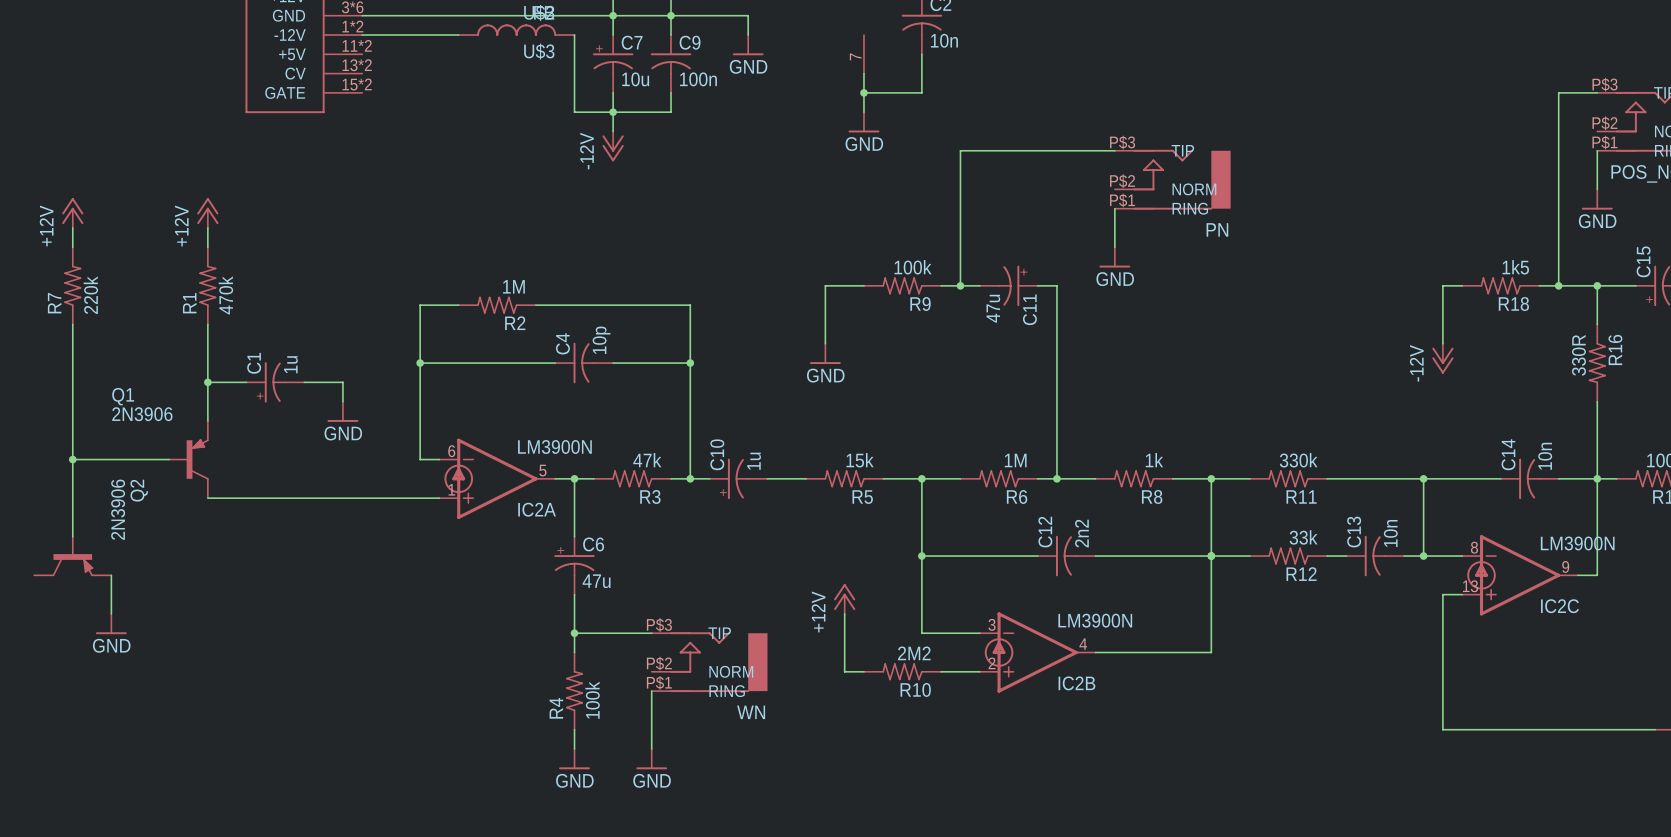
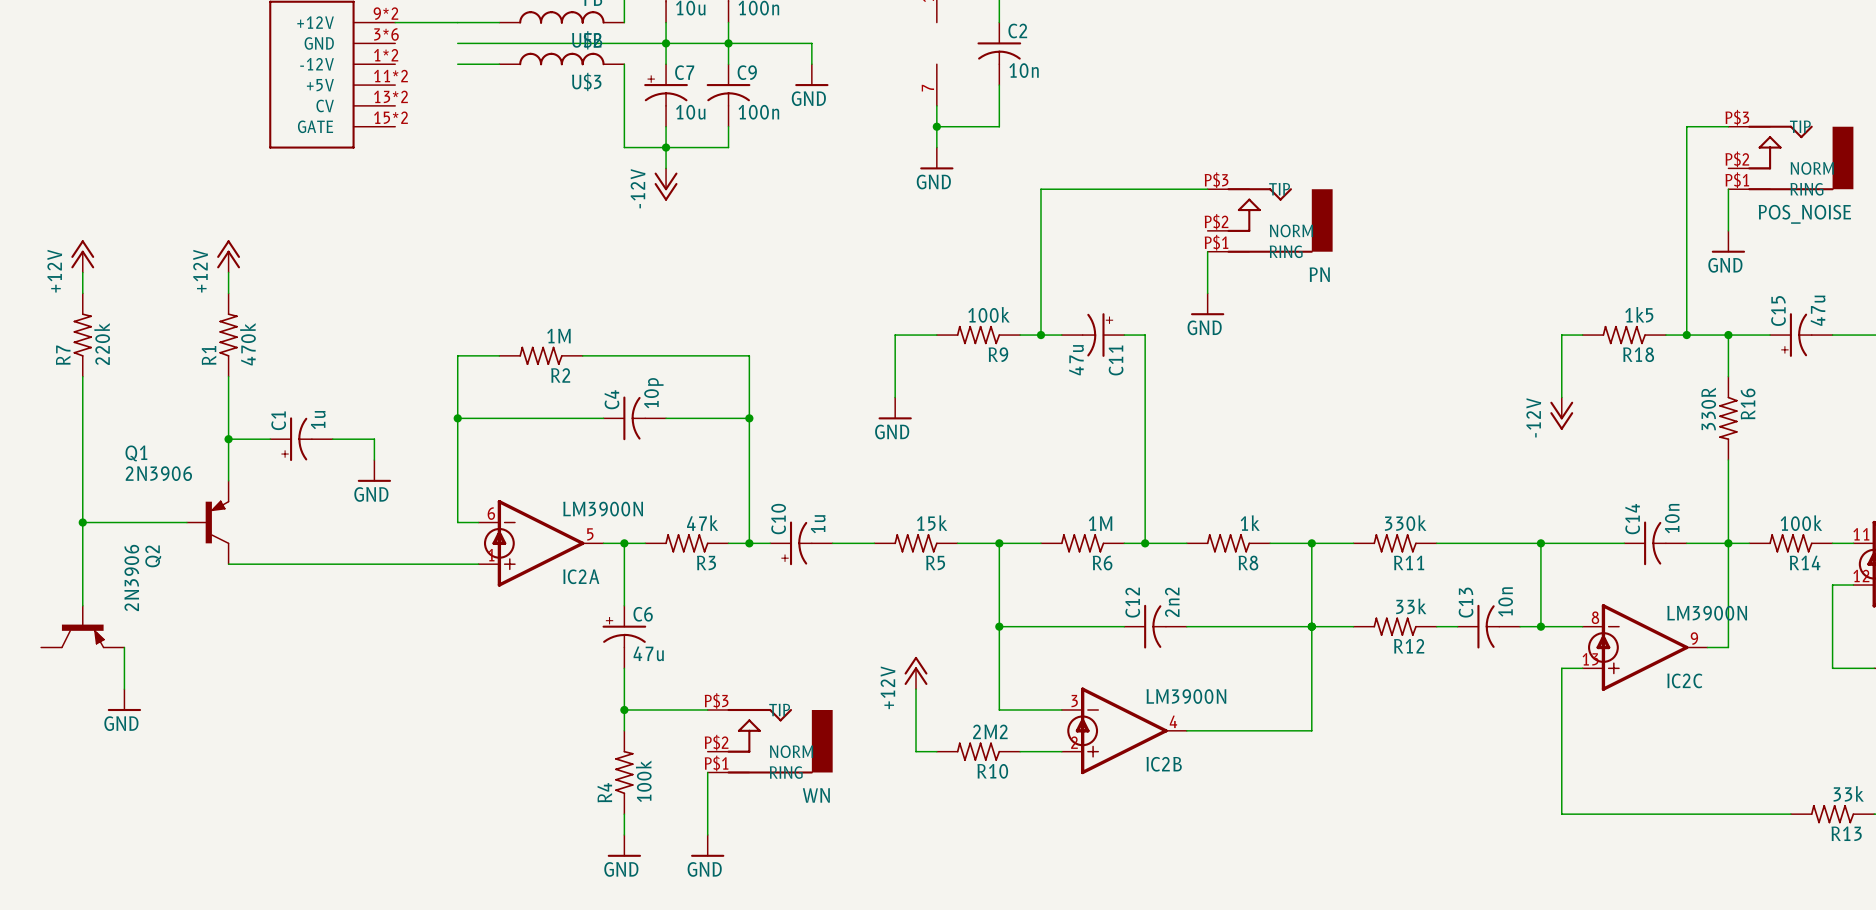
wire: (362, 15) (420, 15) -> none
wire: (362, 35) (420, 35) -> none

